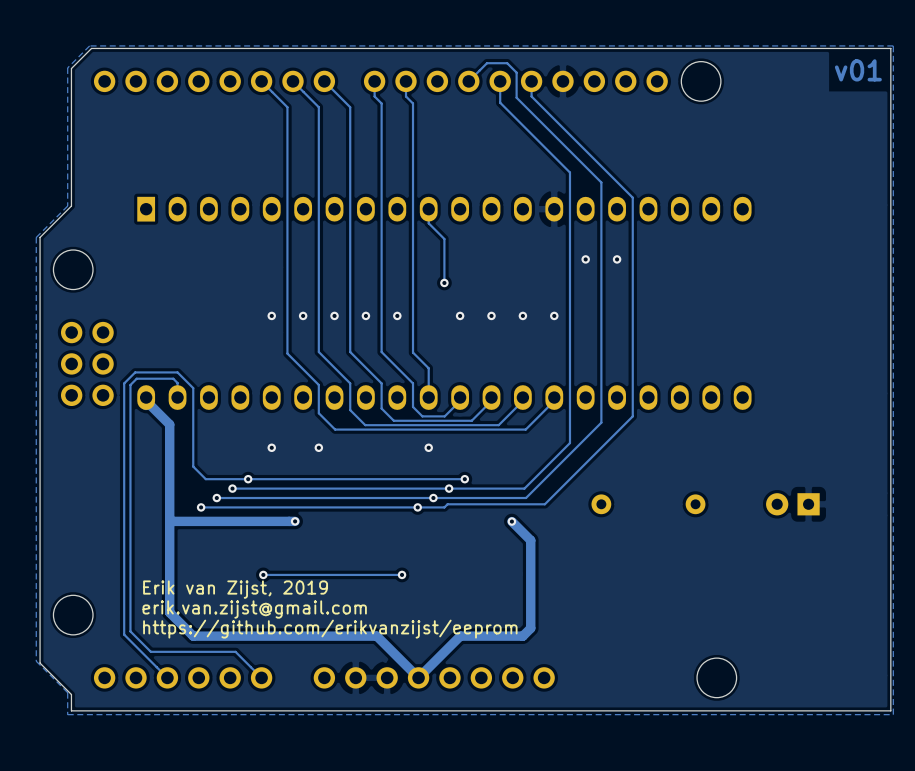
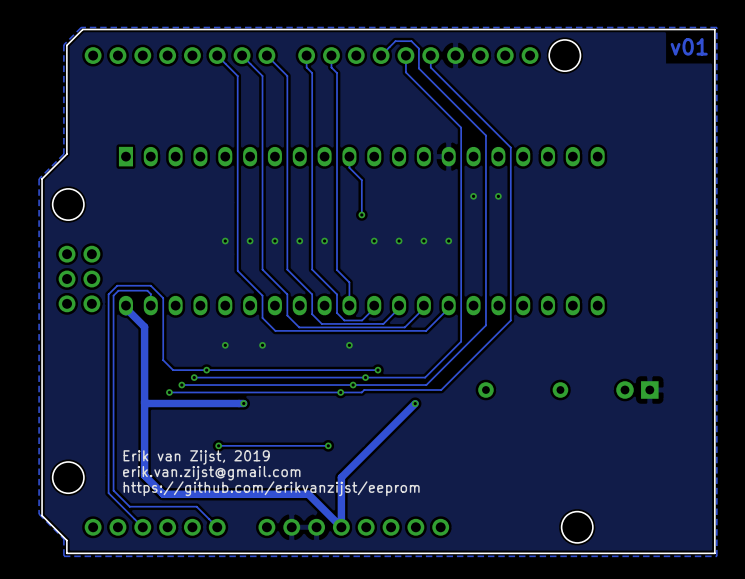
track: (511, 521) (530, 540) (530, 628) (522, 636) (460, 636) (418, 677) -> (415, 403) (341, 477) (341, 527)

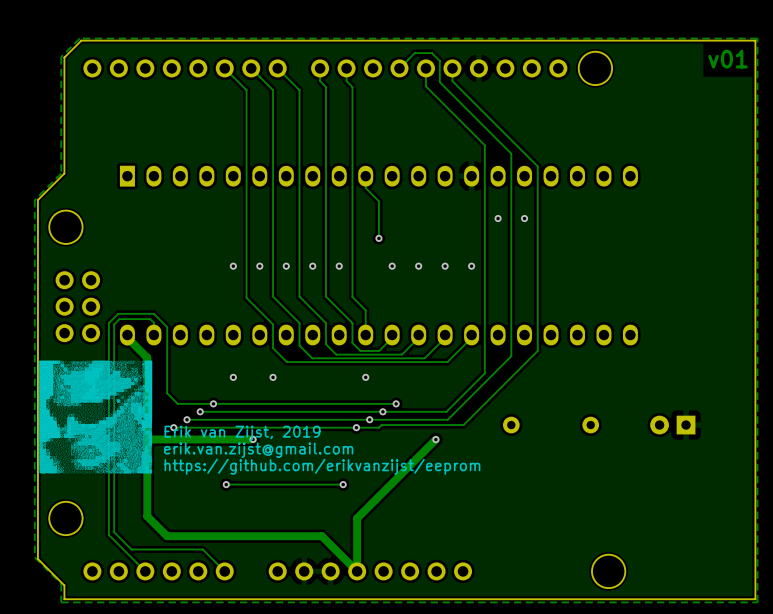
drawing: none -> [39, 360, 153, 474]
text position: Erik van Zijst, 2019 (196, 457) -> Erik van Zijst, 2019 (242, 433)
text position: erik.van.zijst@gmail.com (211, 473) -> erik.van.zijst@gmail.com (258, 450)
text position: https://github.com/erikvanzijst/eeprom (271, 488) -> https://github.com/erikvanzijst/eeprom (322, 466)

